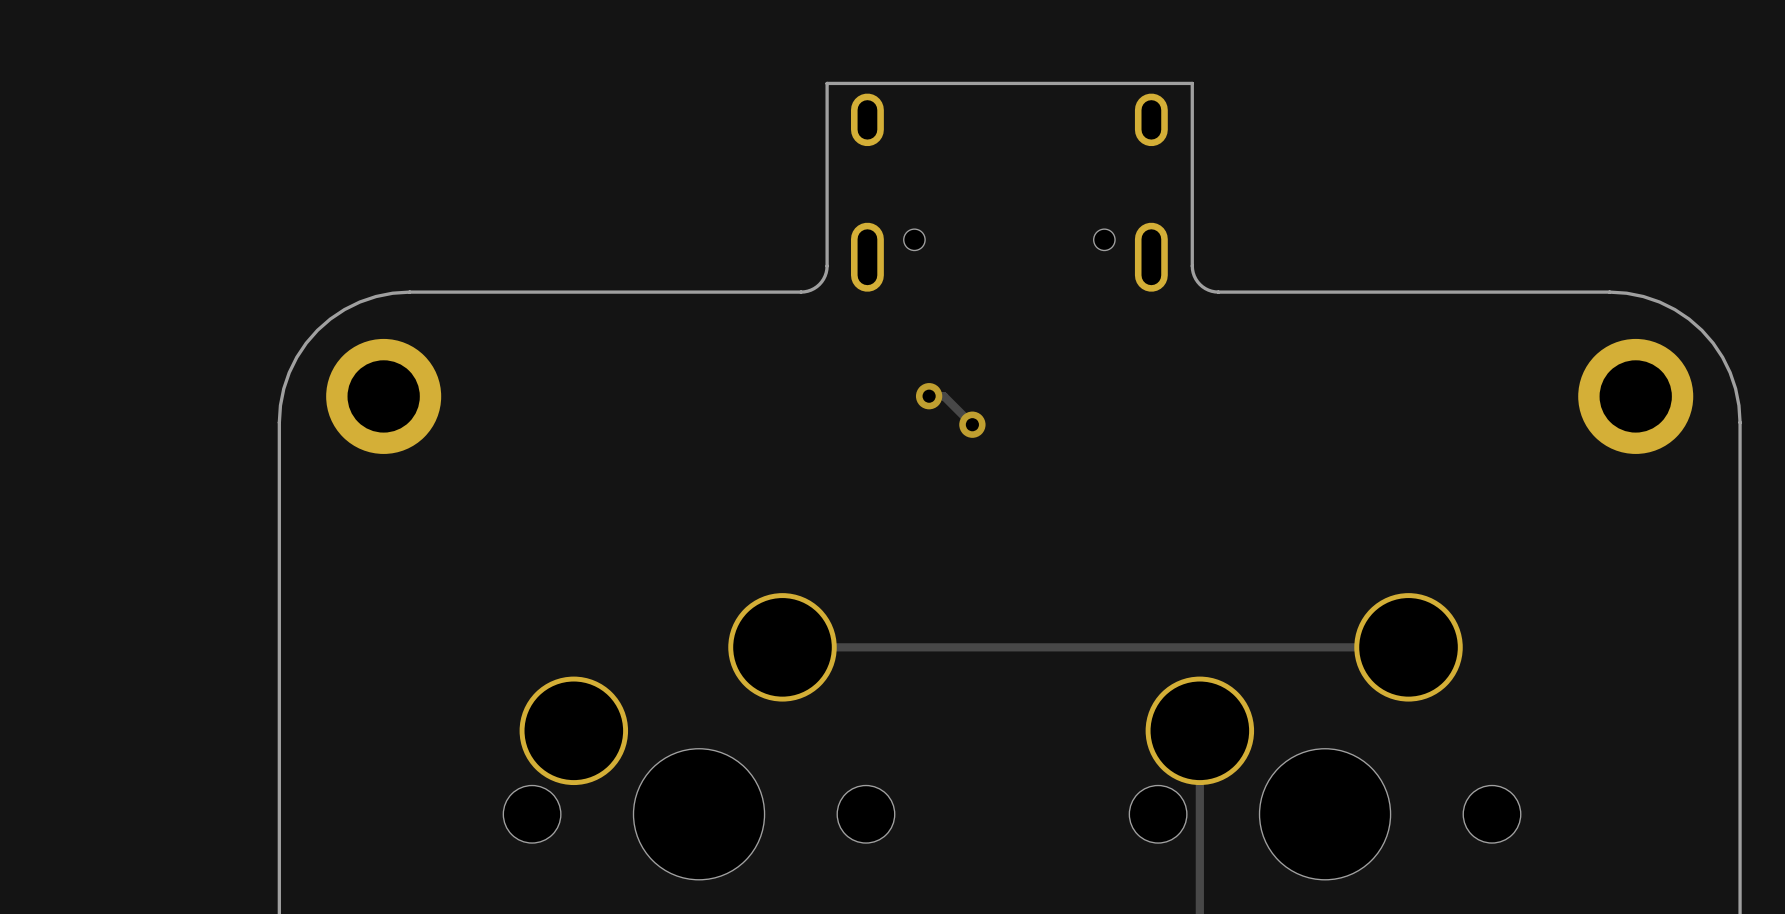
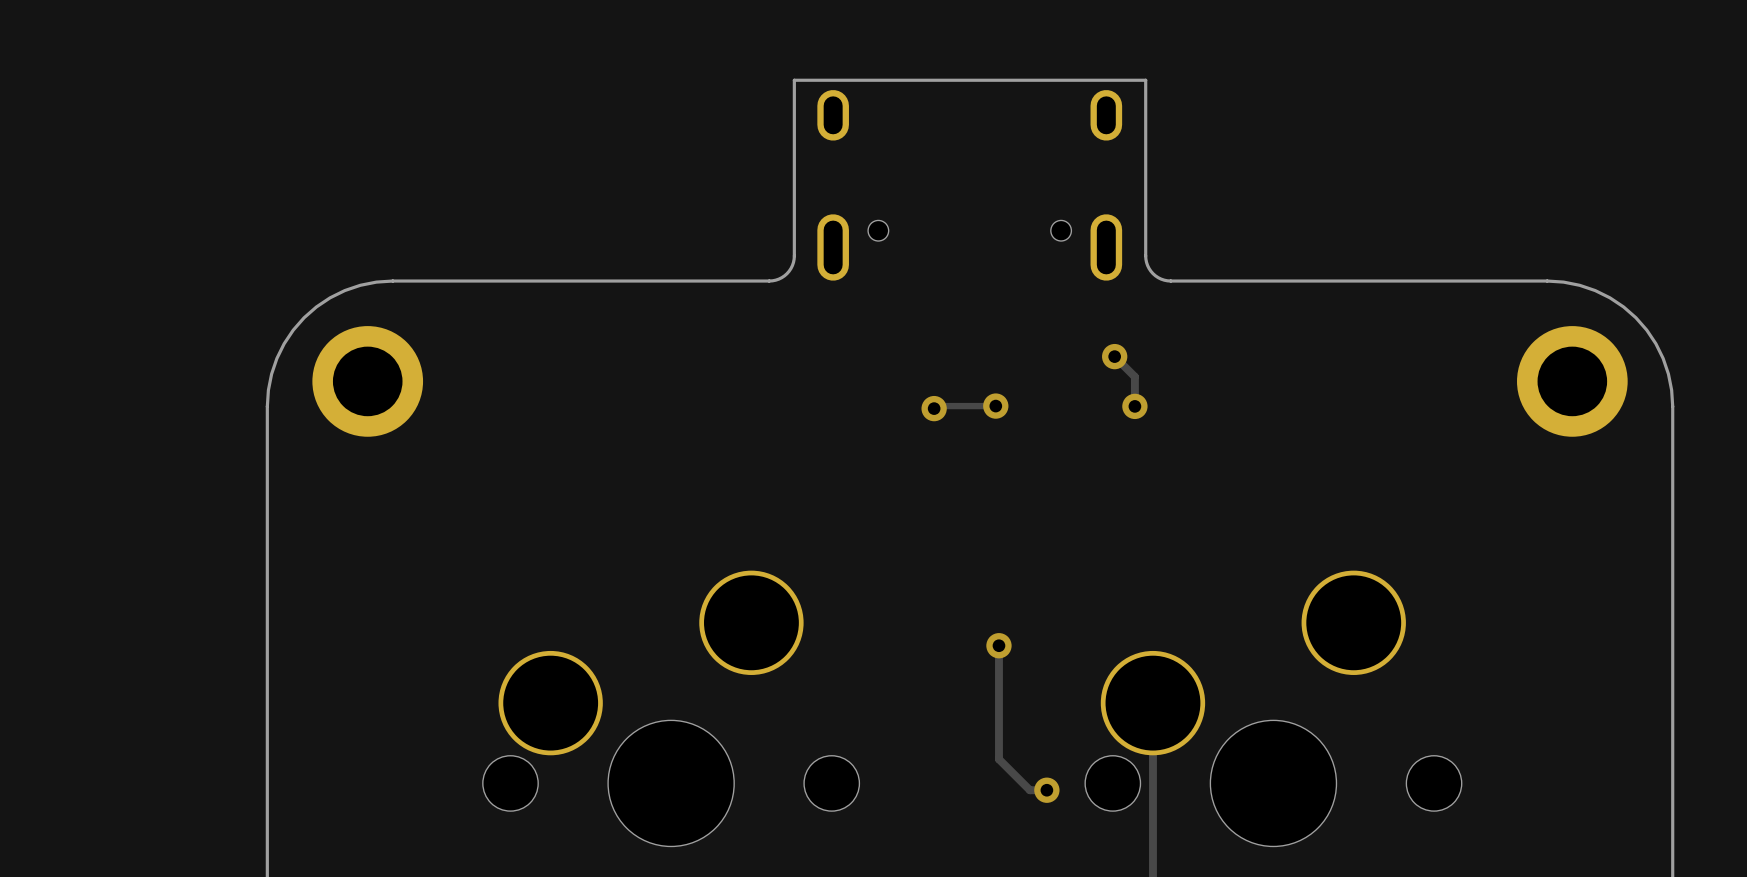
track: none -> (1114, 356) (1134, 376) (1134, 406)
via: none -> (1114, 356)
track: (929, 396) (943, 396) (972, 424) -> none
via position: (929, 396) -> (995, 406)
track: none -> (938, 406) (995, 406)
via: none -> (1134, 406)
track: (782, 647) (1408, 647) -> none
track: none -> (998, 645) (998, 759) (1029, 790) (1046, 790)
via: none -> (998, 645)
via: none -> (1046, 790)

